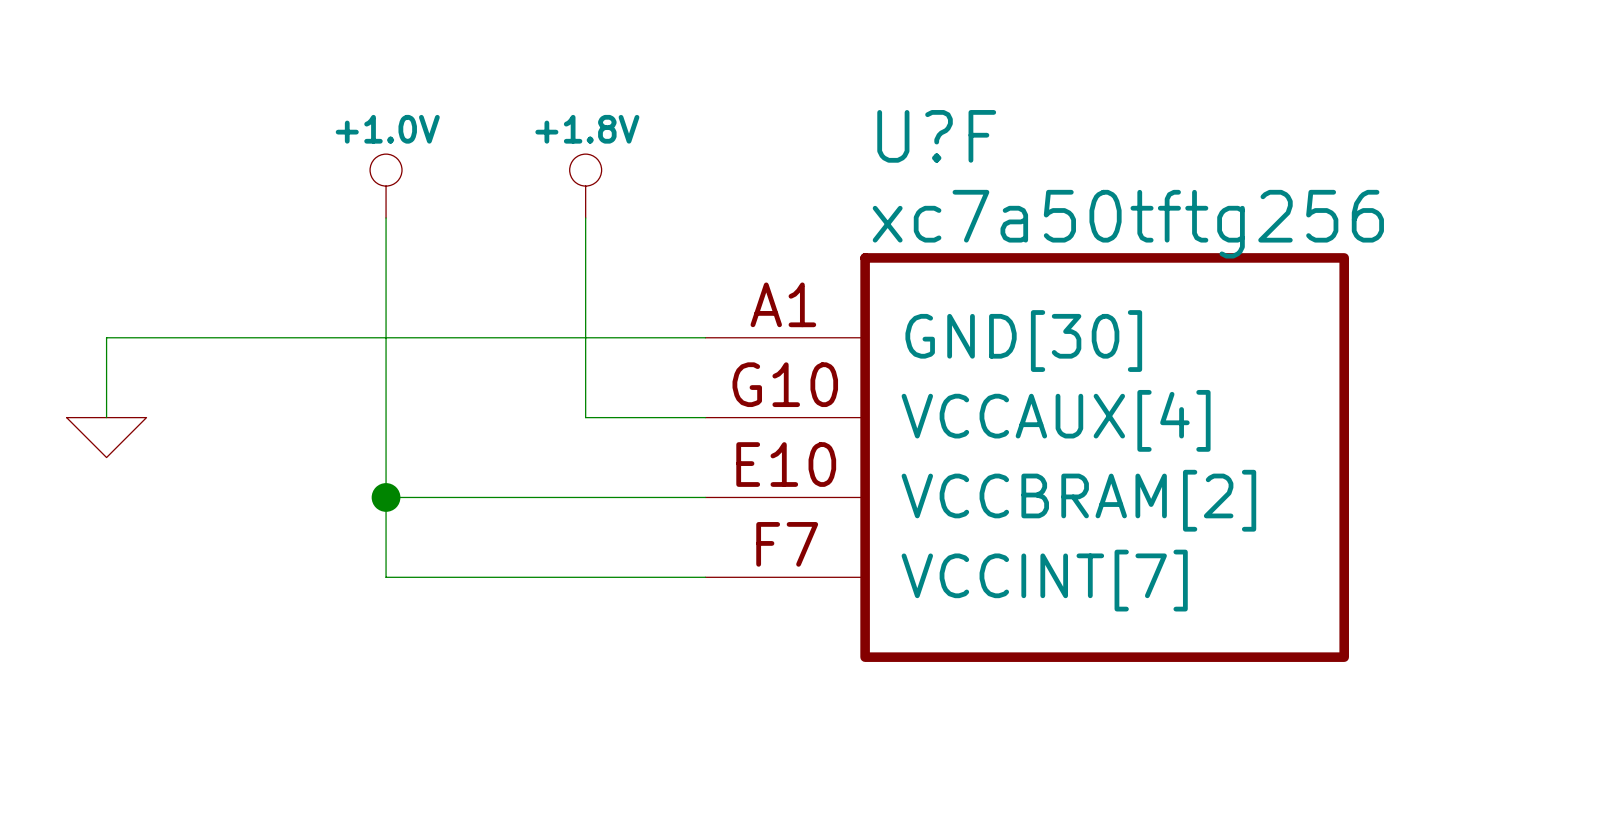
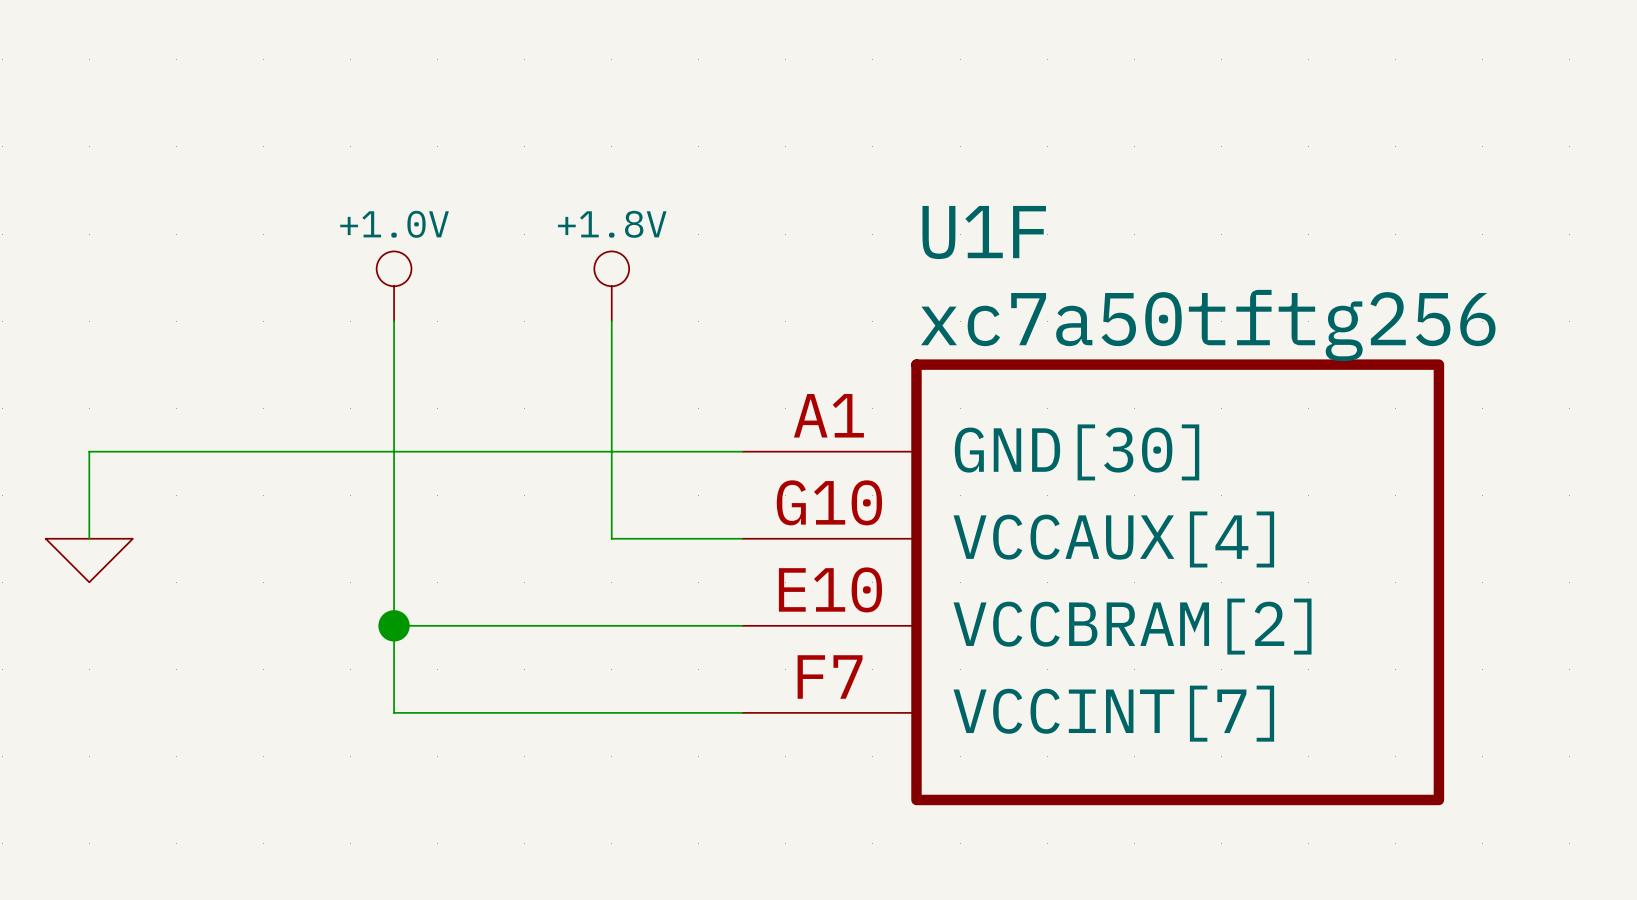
U?F name: U?F (936, 136) -> U1F (984, 232)

